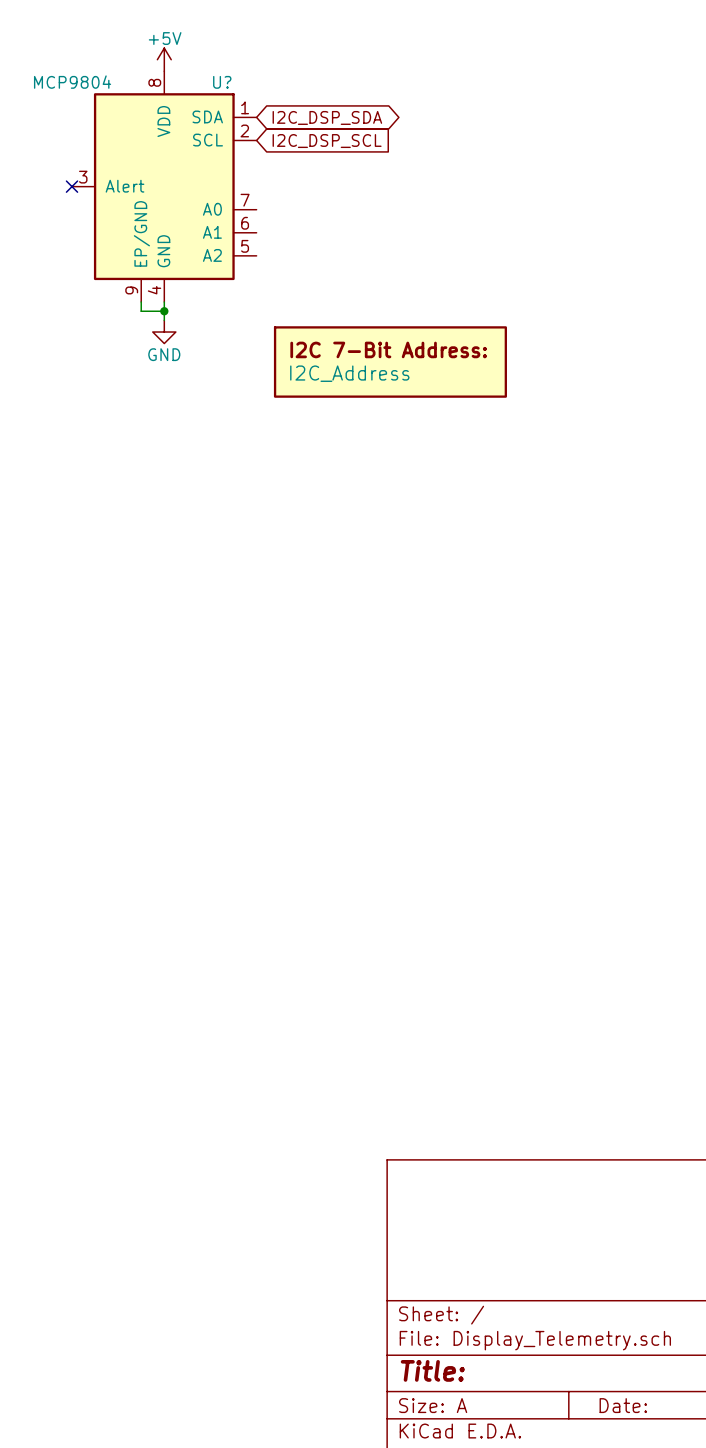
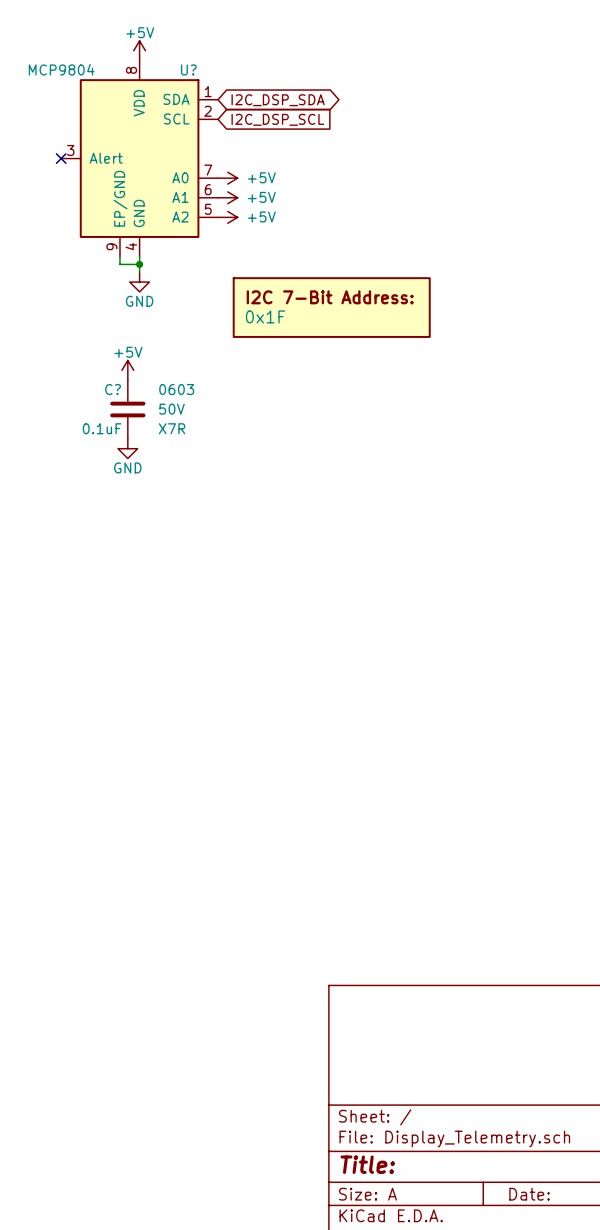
power symbol: none -> +5V (227, 178)
power symbol: none -> +5V (227, 197)
power symbol: none -> +5V (227, 217)
part value: I2C_Address (349, 373) -> 0x1F (265, 316)
power symbol: none -> +5V (127, 370)
C?: none -> 0.1uF (127, 409)
power symbol: none -> GND (127, 448)

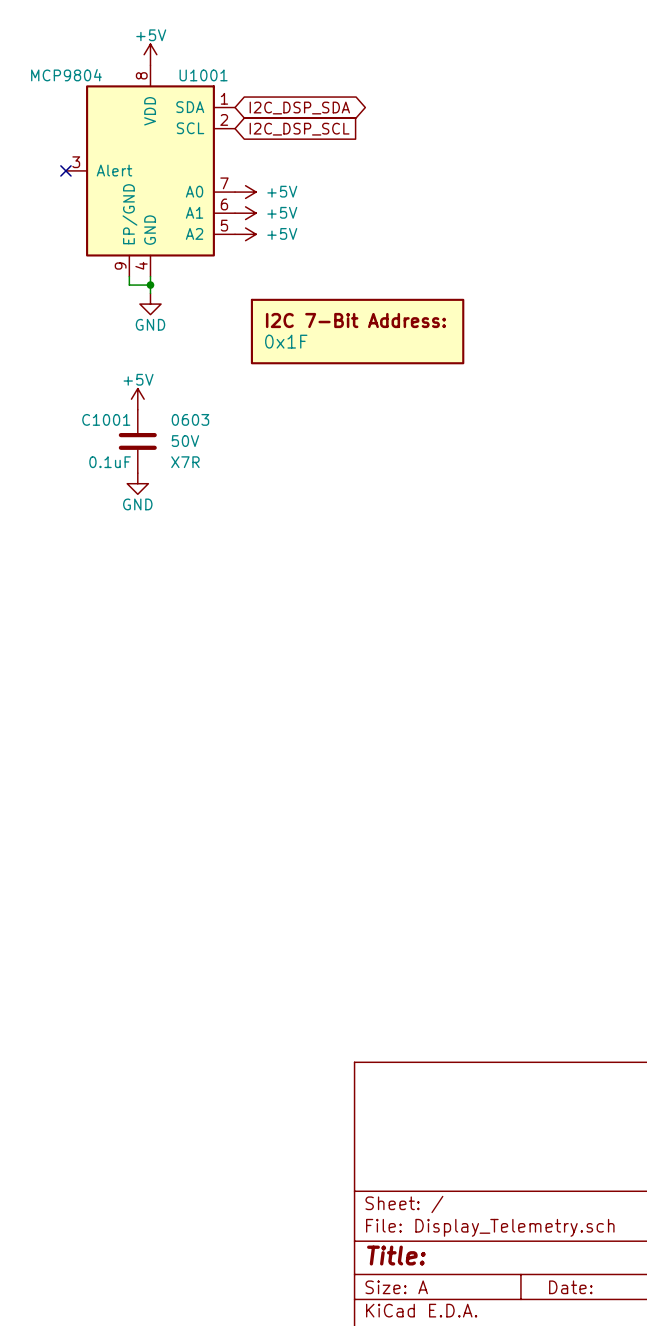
U? name: U? (188, 69) -> U1001 (203, 75)
C? name: C? (113, 389) -> C1001 (106, 419)

